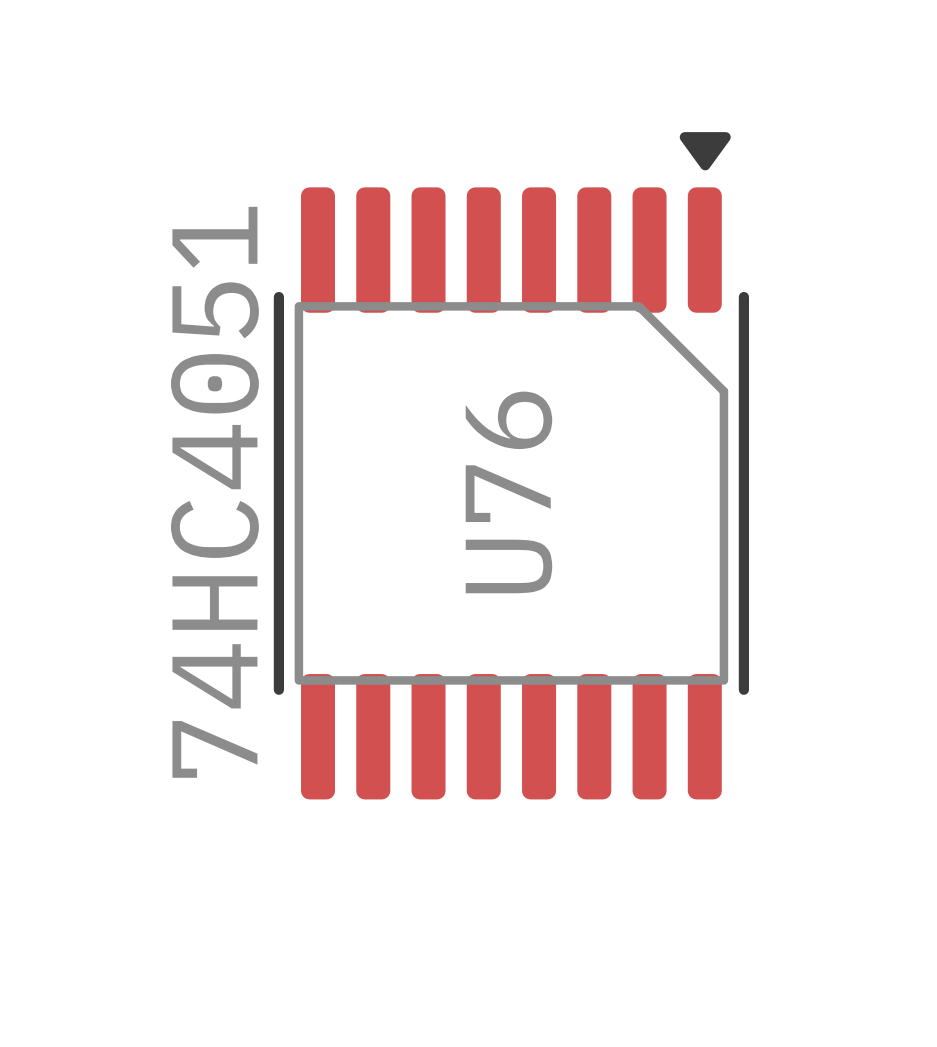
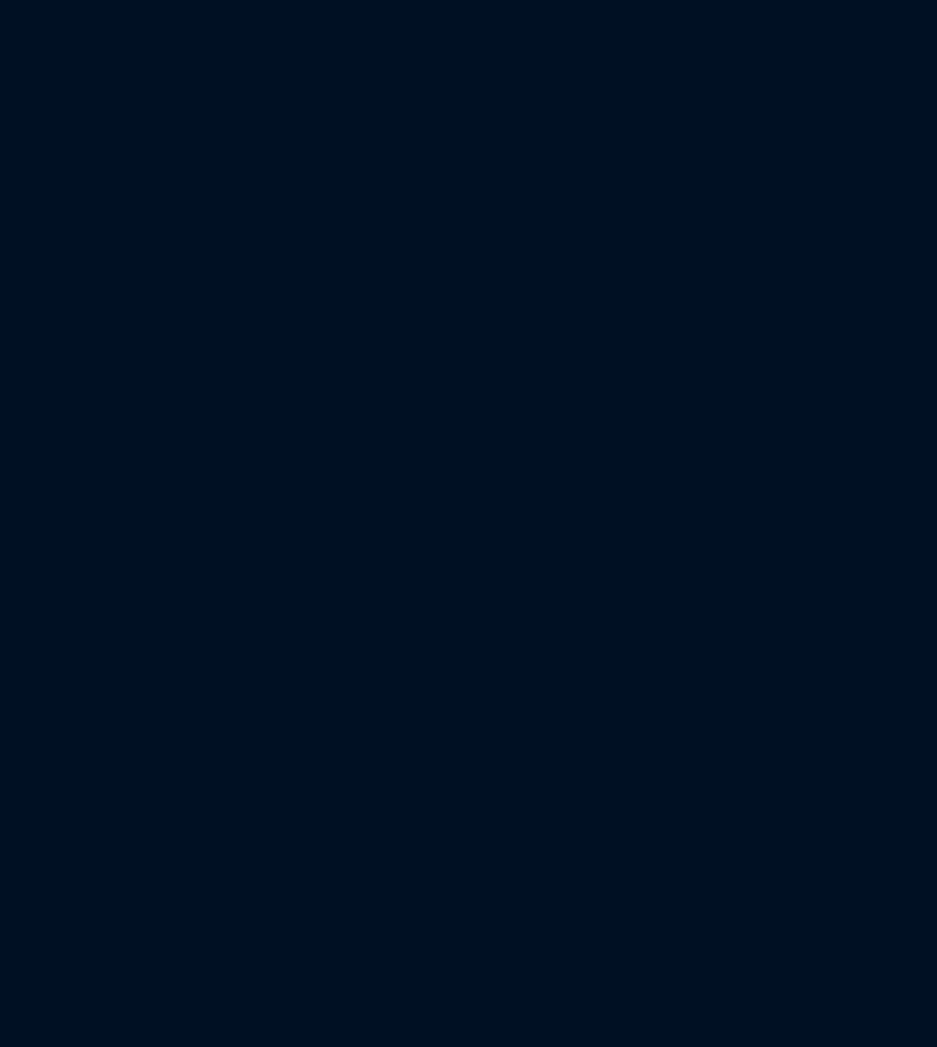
U76: 74HC4051 (511, 465) -> none

